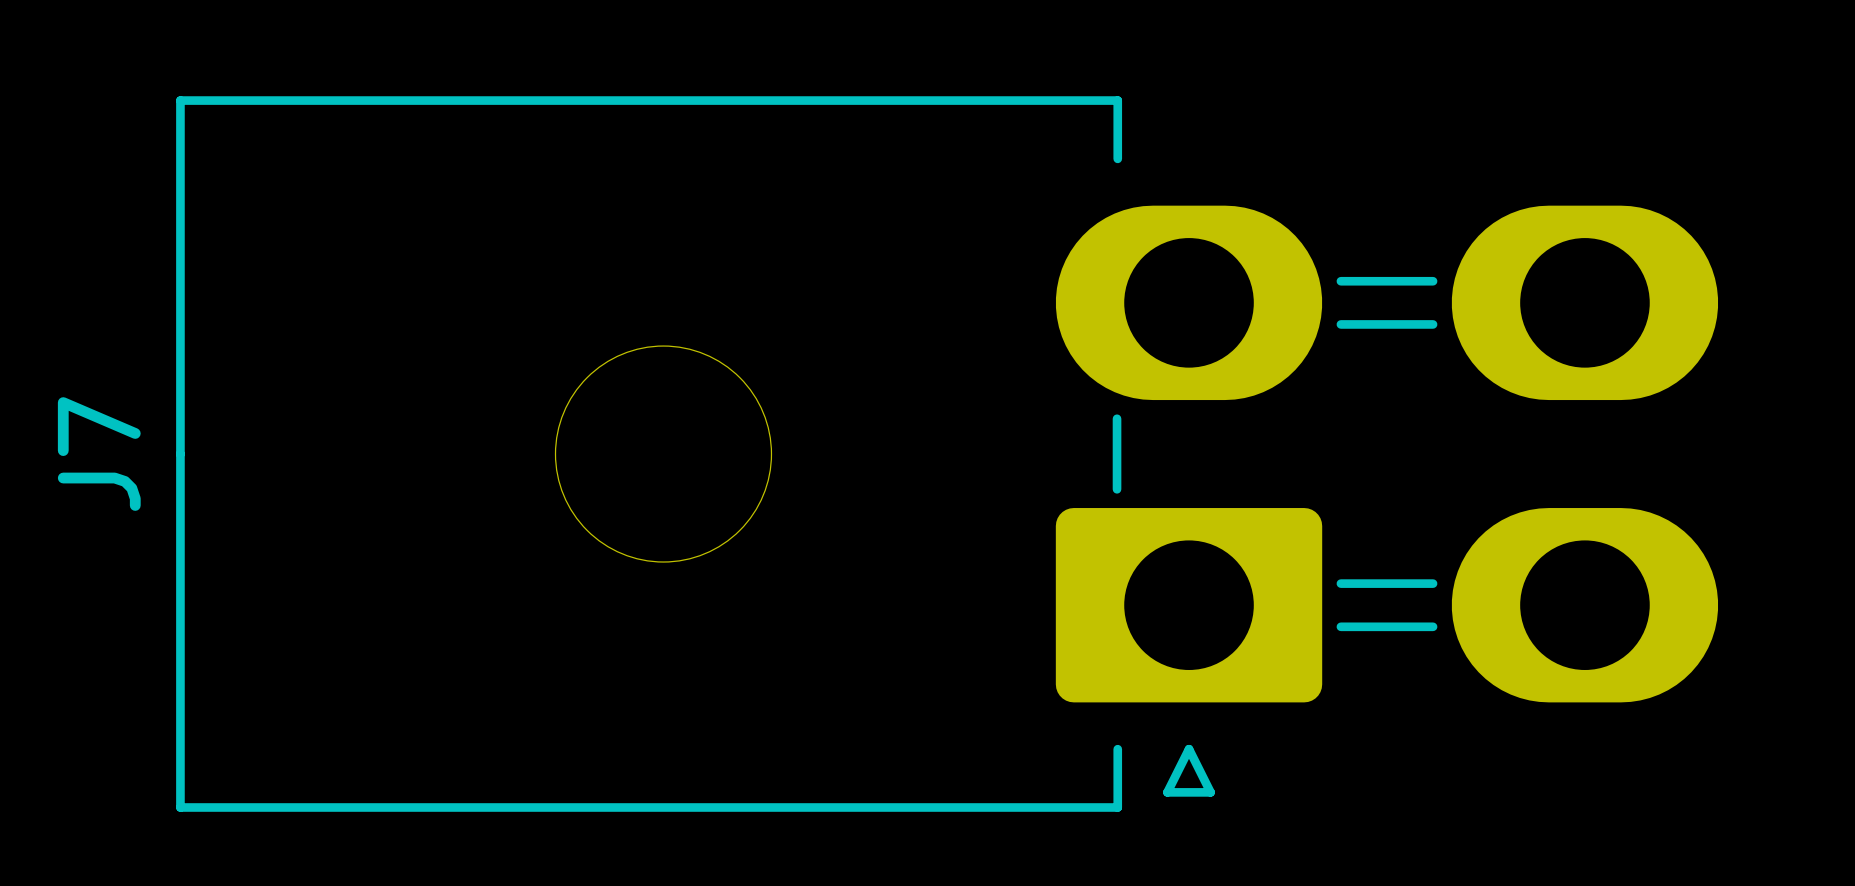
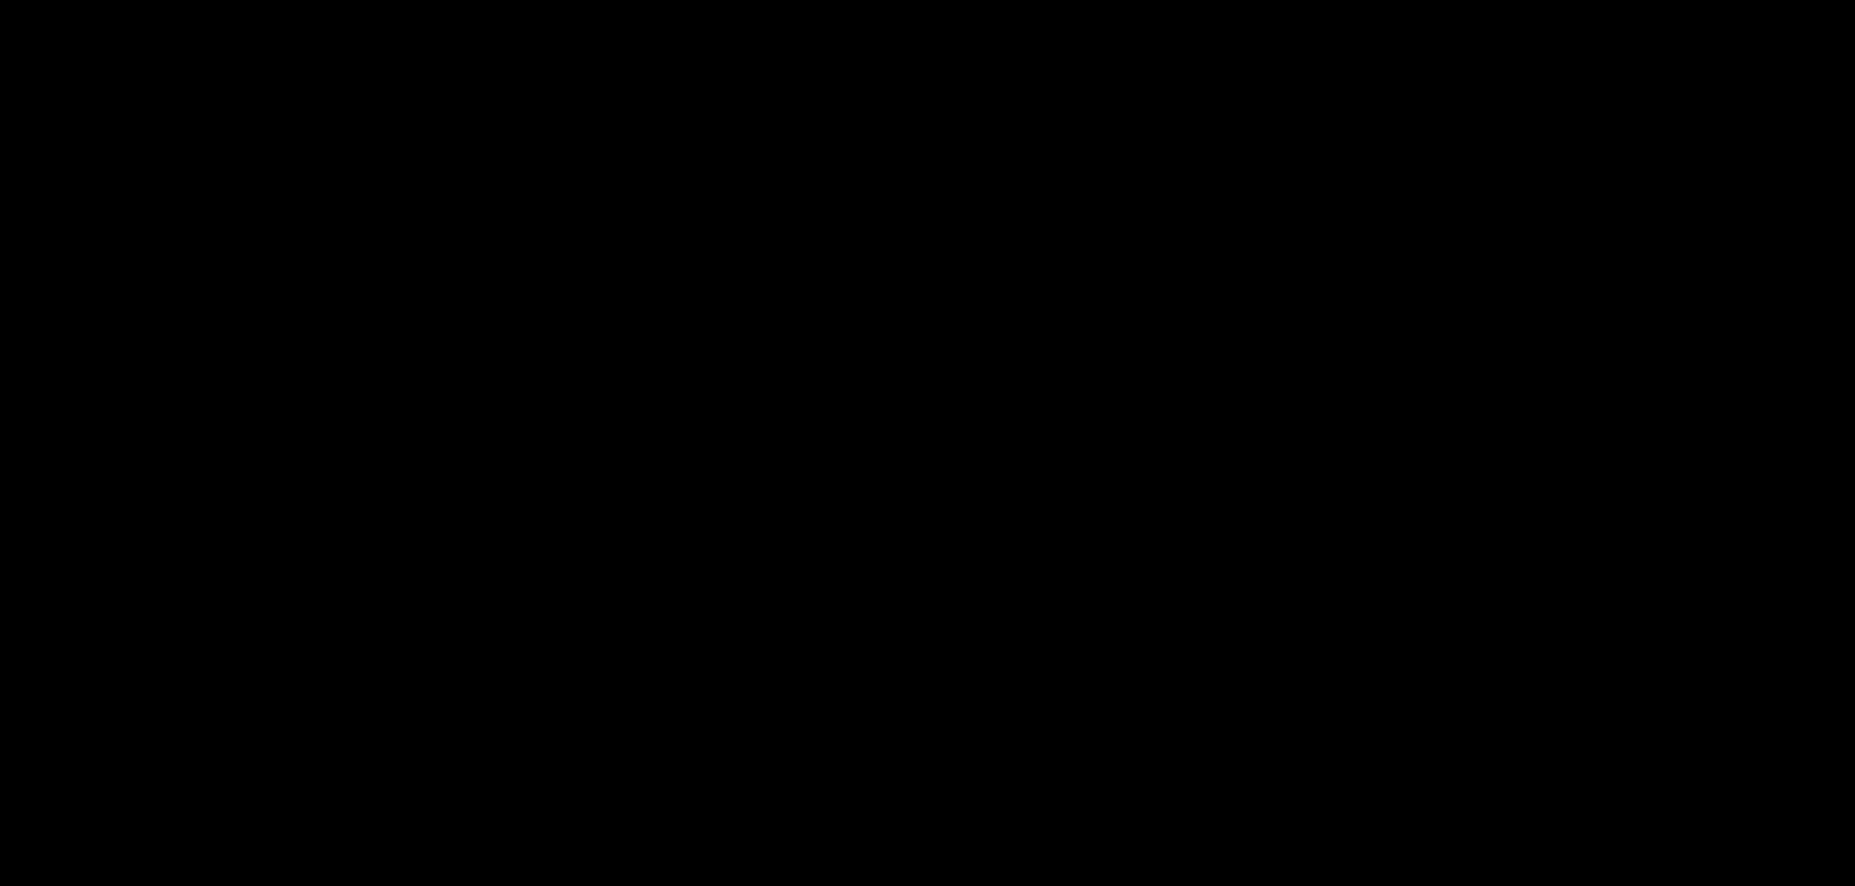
J7: (947, 454) -> none

